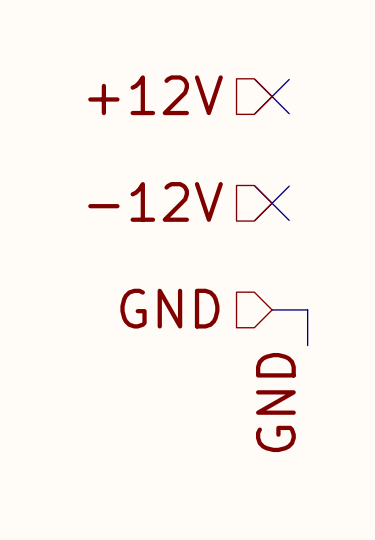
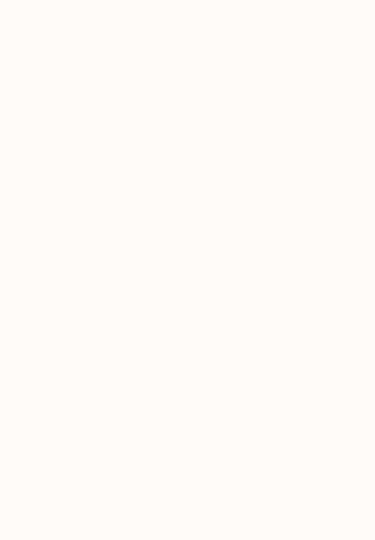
hierarchical label: +12V (155, 95) -> none
no-connect mark: (272, 96) -> none
hierarchical label: -12V (155, 201) -> none
no-connect mark: (272, 203) -> none
hierarchical label: GND (169, 308) -> none
wire: (272, 309) (307, 309) (307, 345) -> none
label: GND (275, 402) -> none

